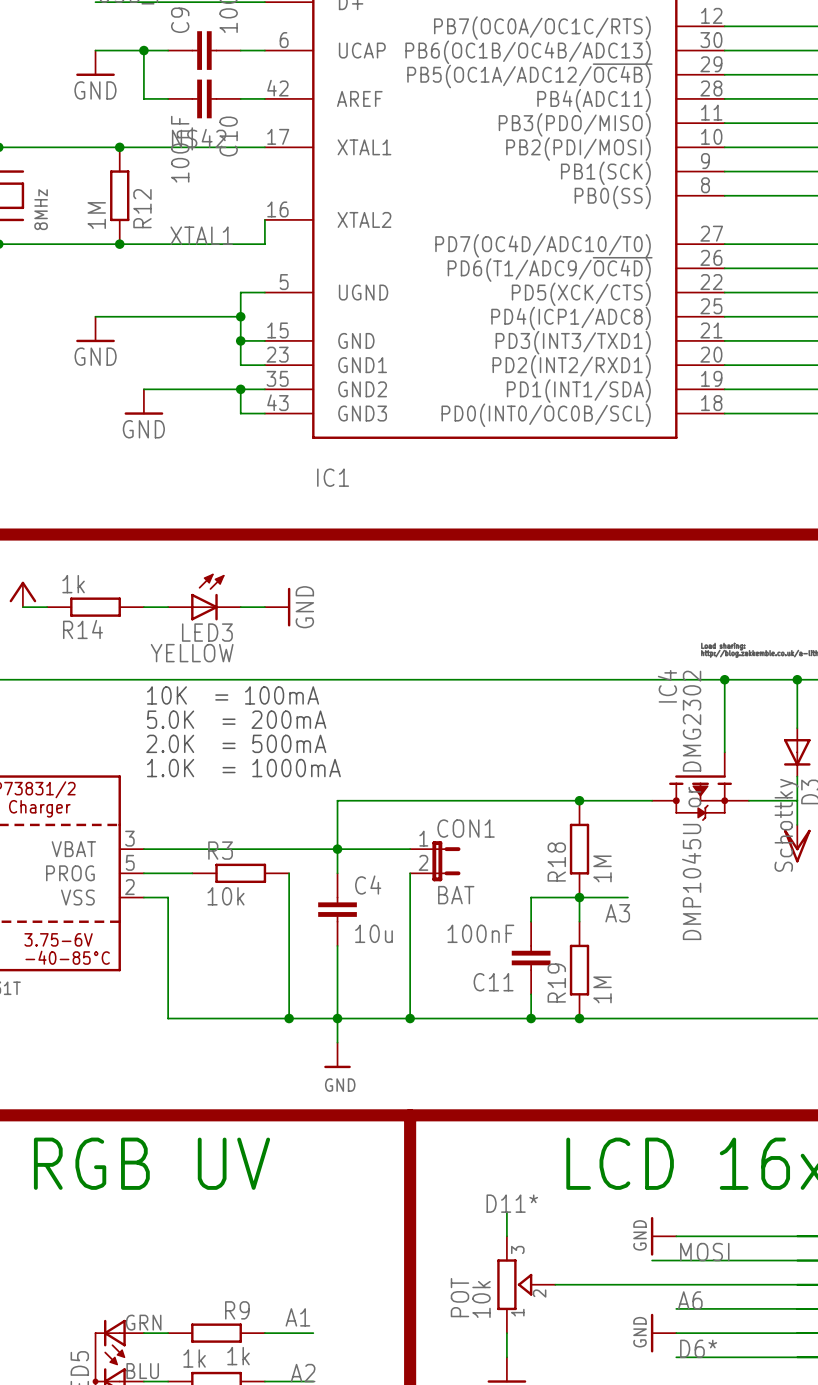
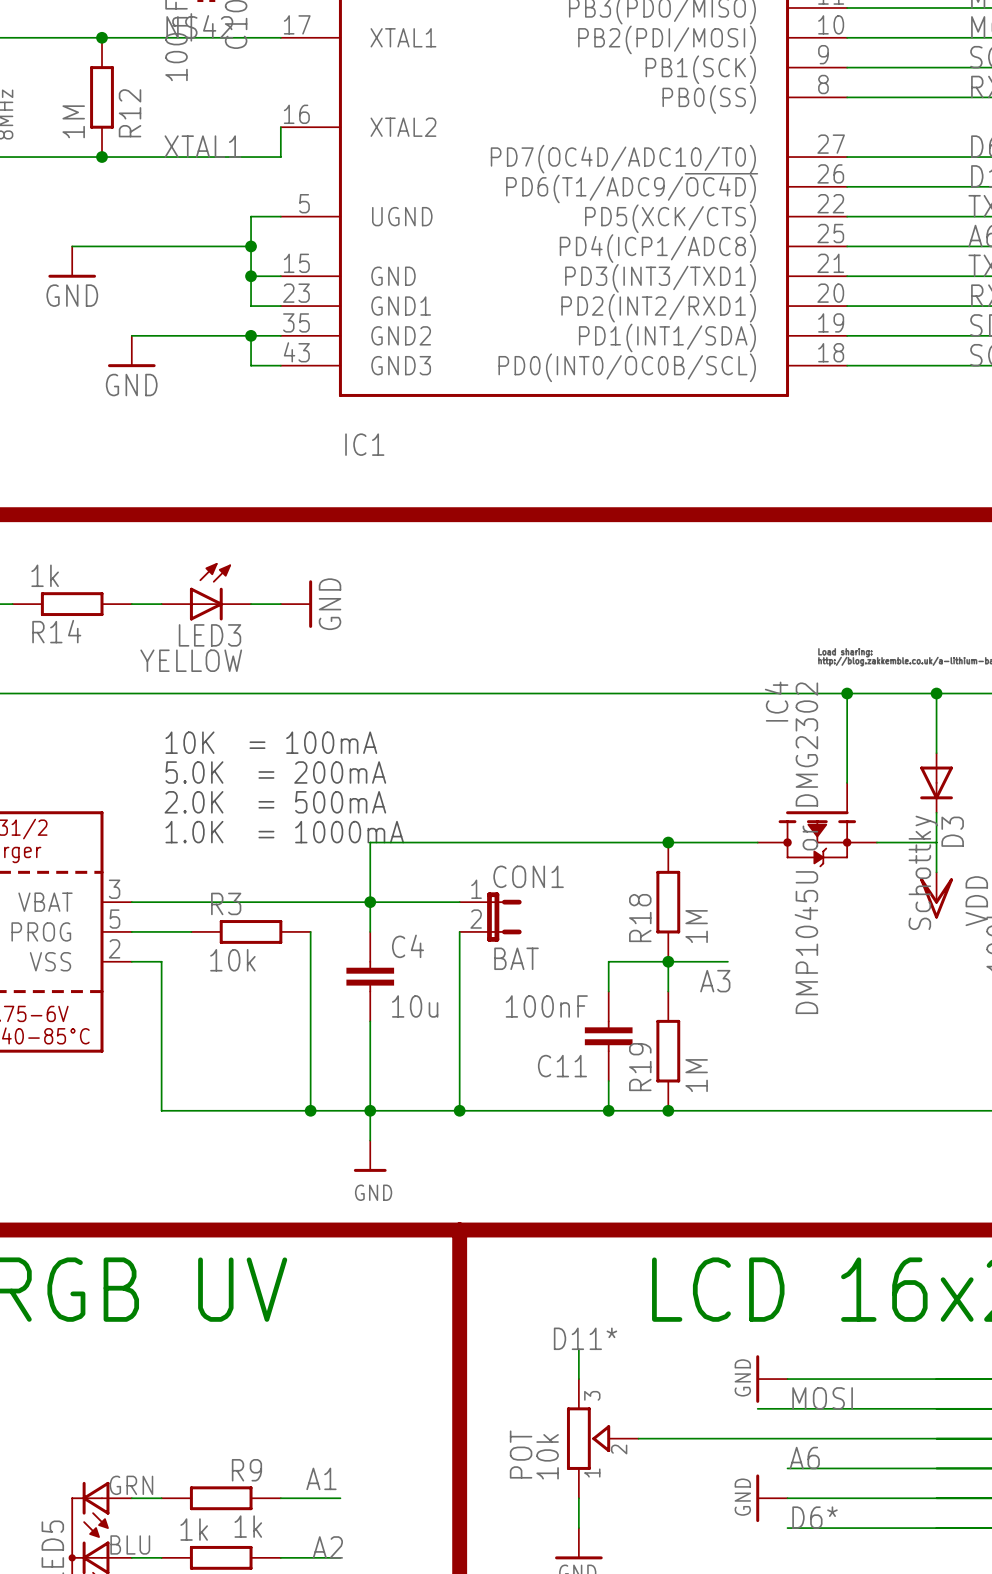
text position: 10K = 100mA (233, 695) -> 10K = 100mA (271, 742)
text position: 5.0K = 200mA (236, 719) -> 5.0K = 200mA (275, 772)
text position: 2.0K = 500mA (236, 743) -> 2.0K = 500mA (275, 802)
text position: 1.0K = 1000mA (243, 768) -> 1.0K = 1000mA (284, 832)

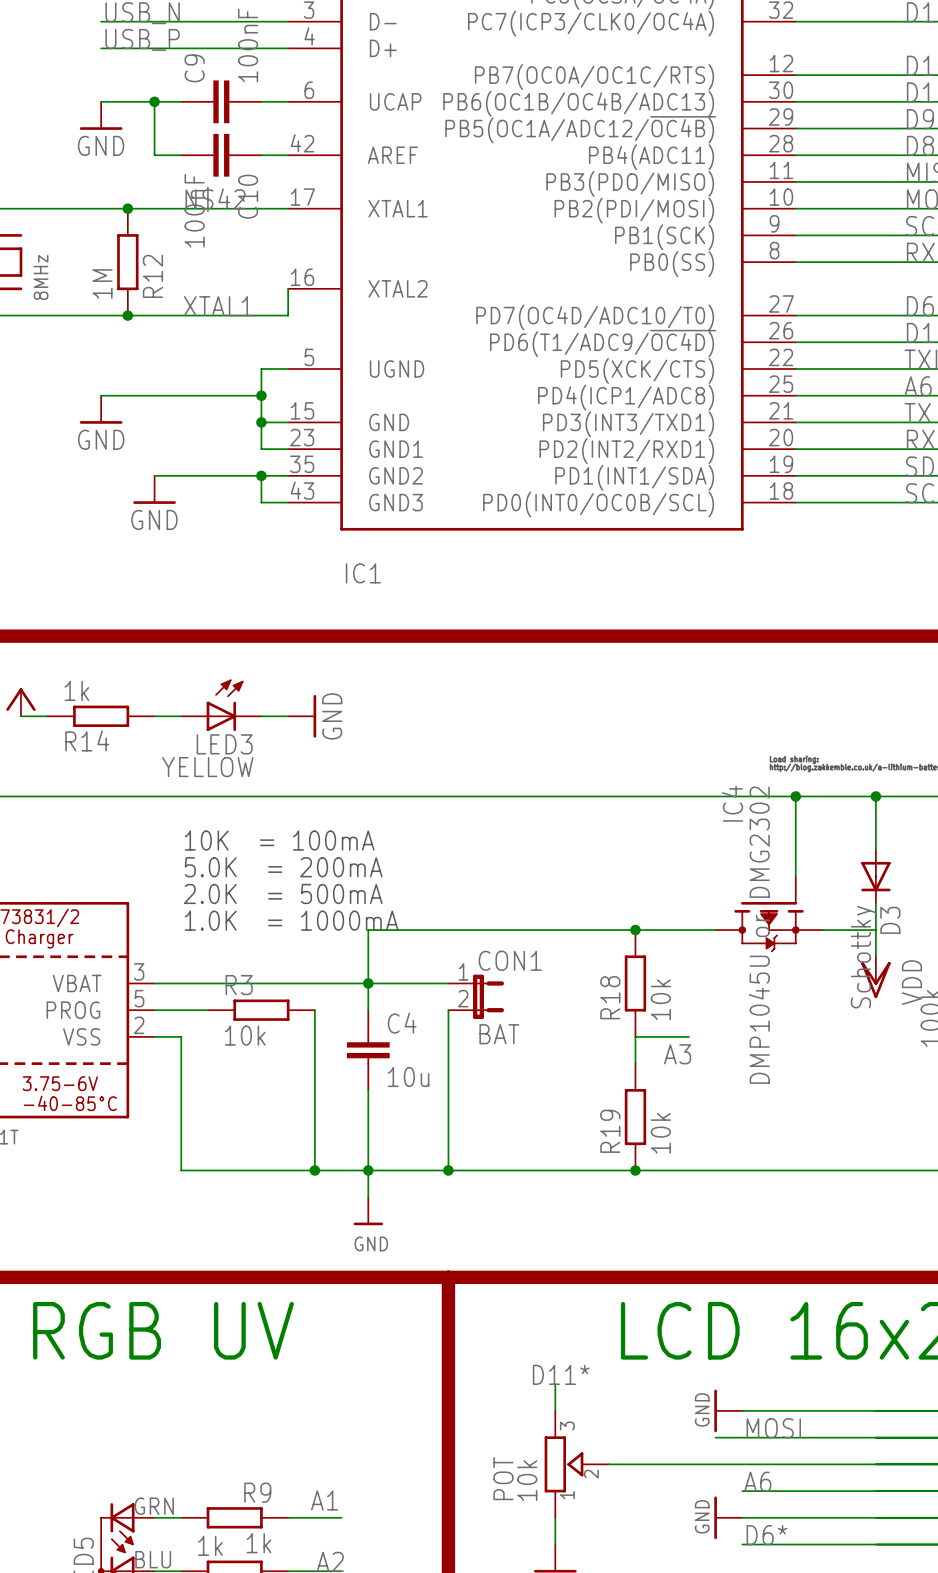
R18 value: 1M (696, 926) -> 10k (660, 999)
wire: (668, 961) (608, 961) (608, 991) -> none
junction: (668, 961) -> none
C11: 100nF (608, 1036) -> none
R19 value: 1M (696, 1075) -> 10k (660, 1133)
wire: (608, 1080) (608, 1110) -> none
junction: (608, 1110) -> none

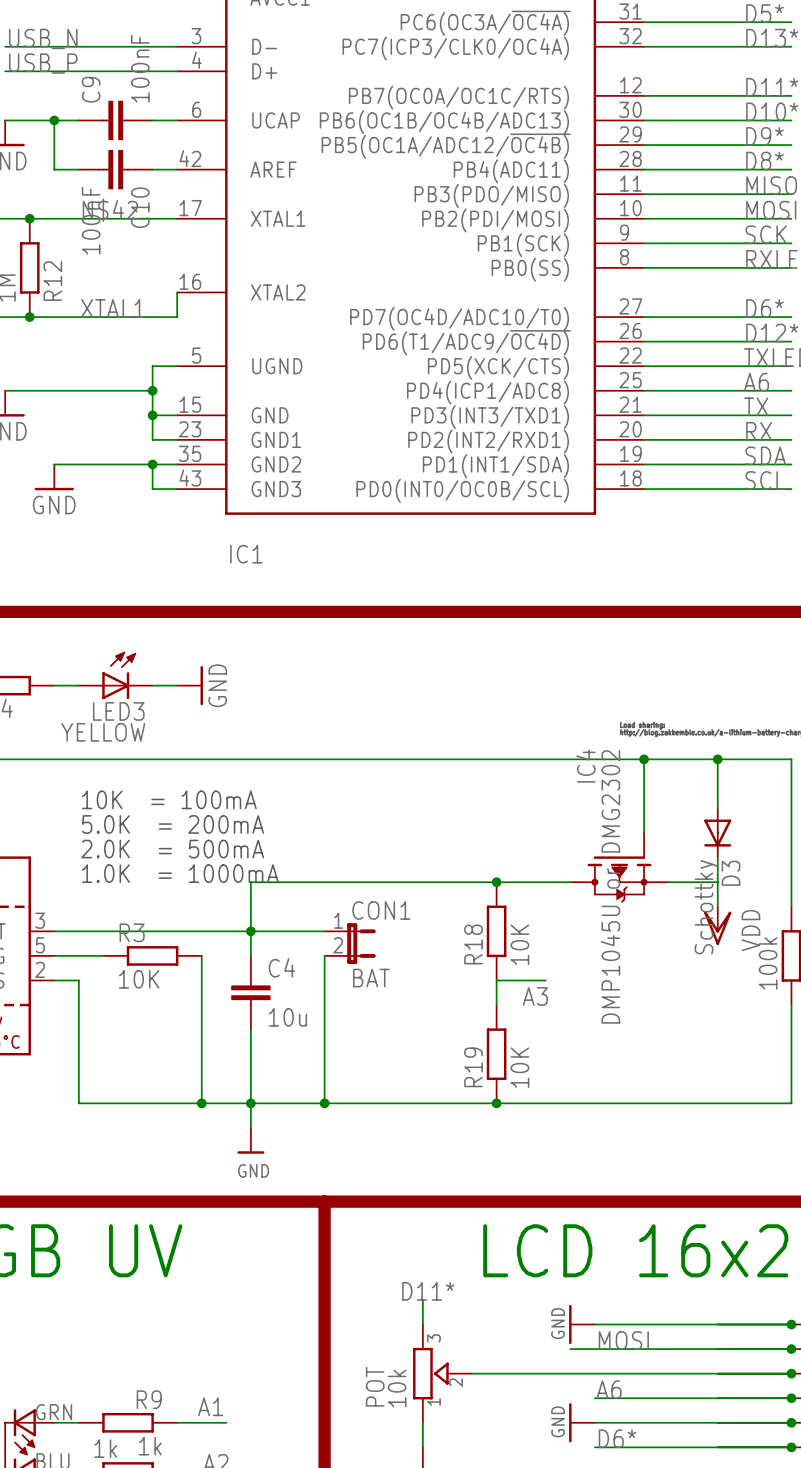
R18 value: 10k (660, 999) -> 10K (519, 944)
R3 value: 10k (245, 1035) -> 10K (139, 979)
R19 value: 10k (660, 1133) -> 10K (519, 1067)

